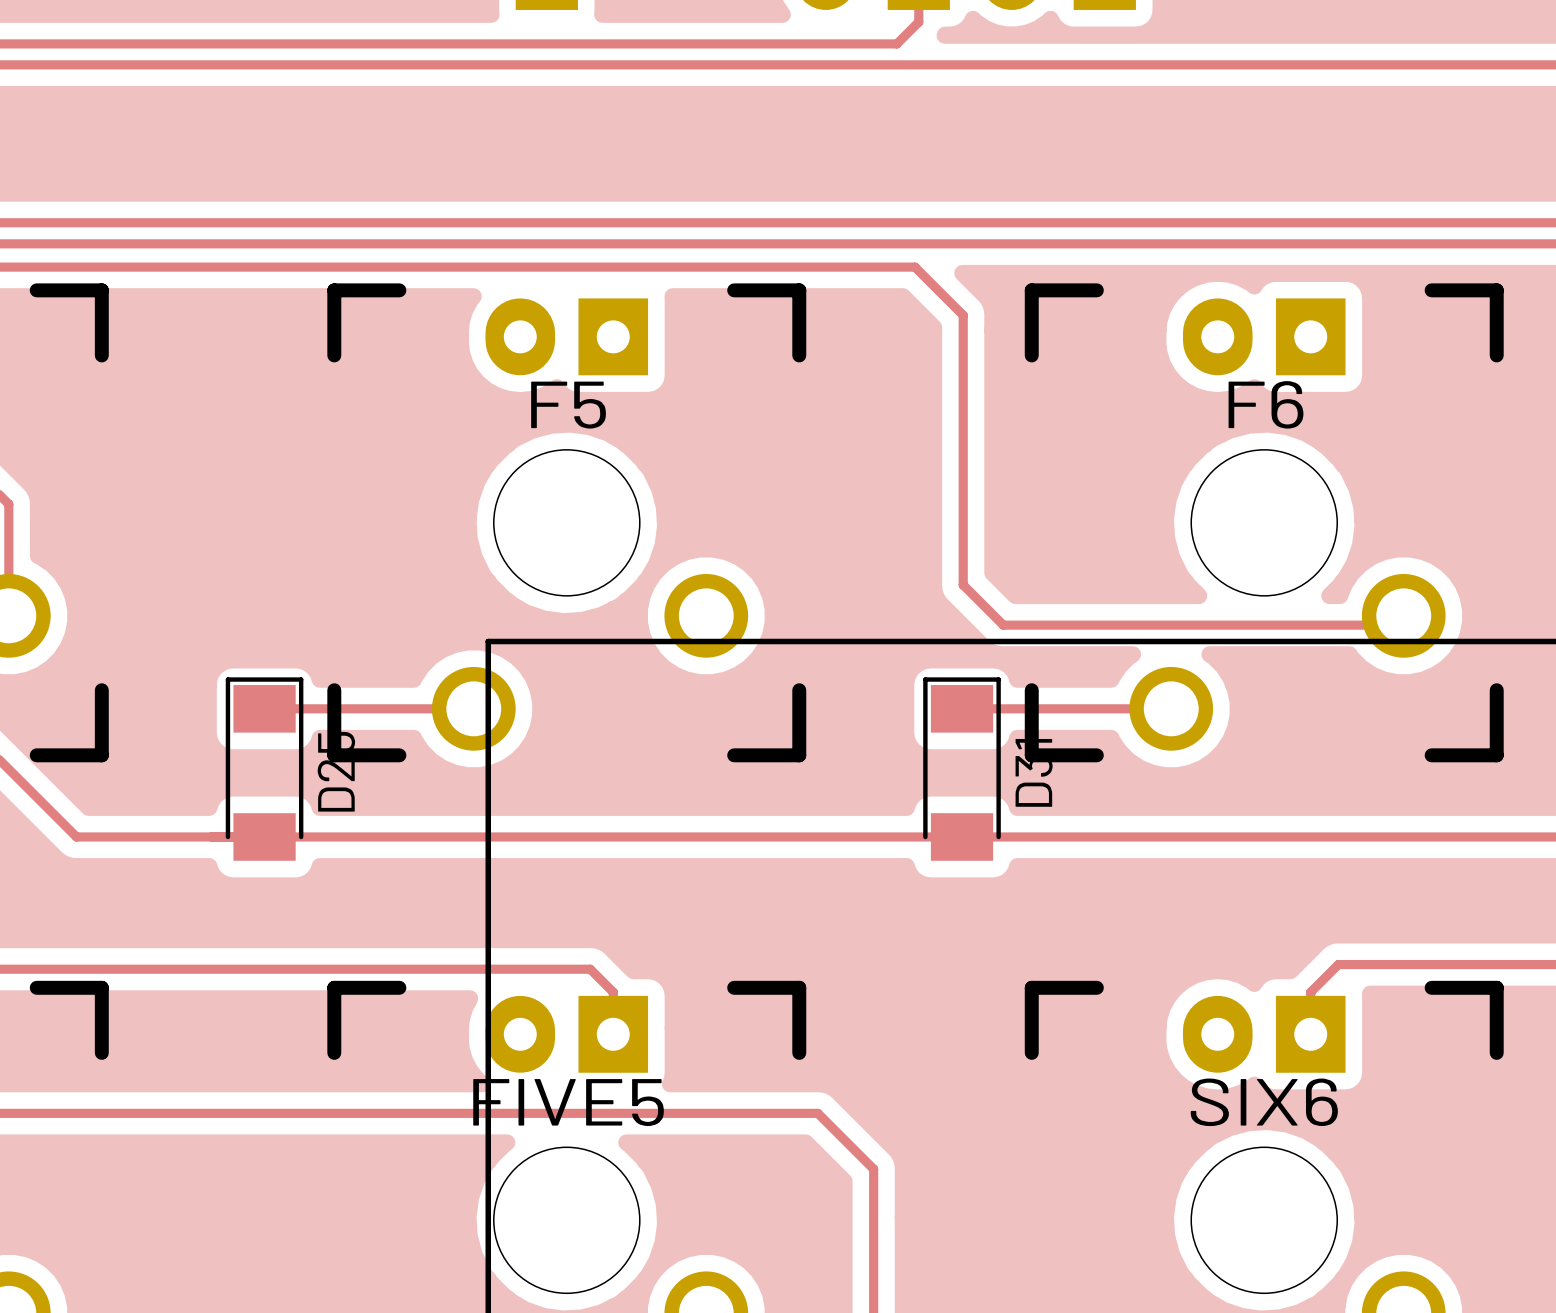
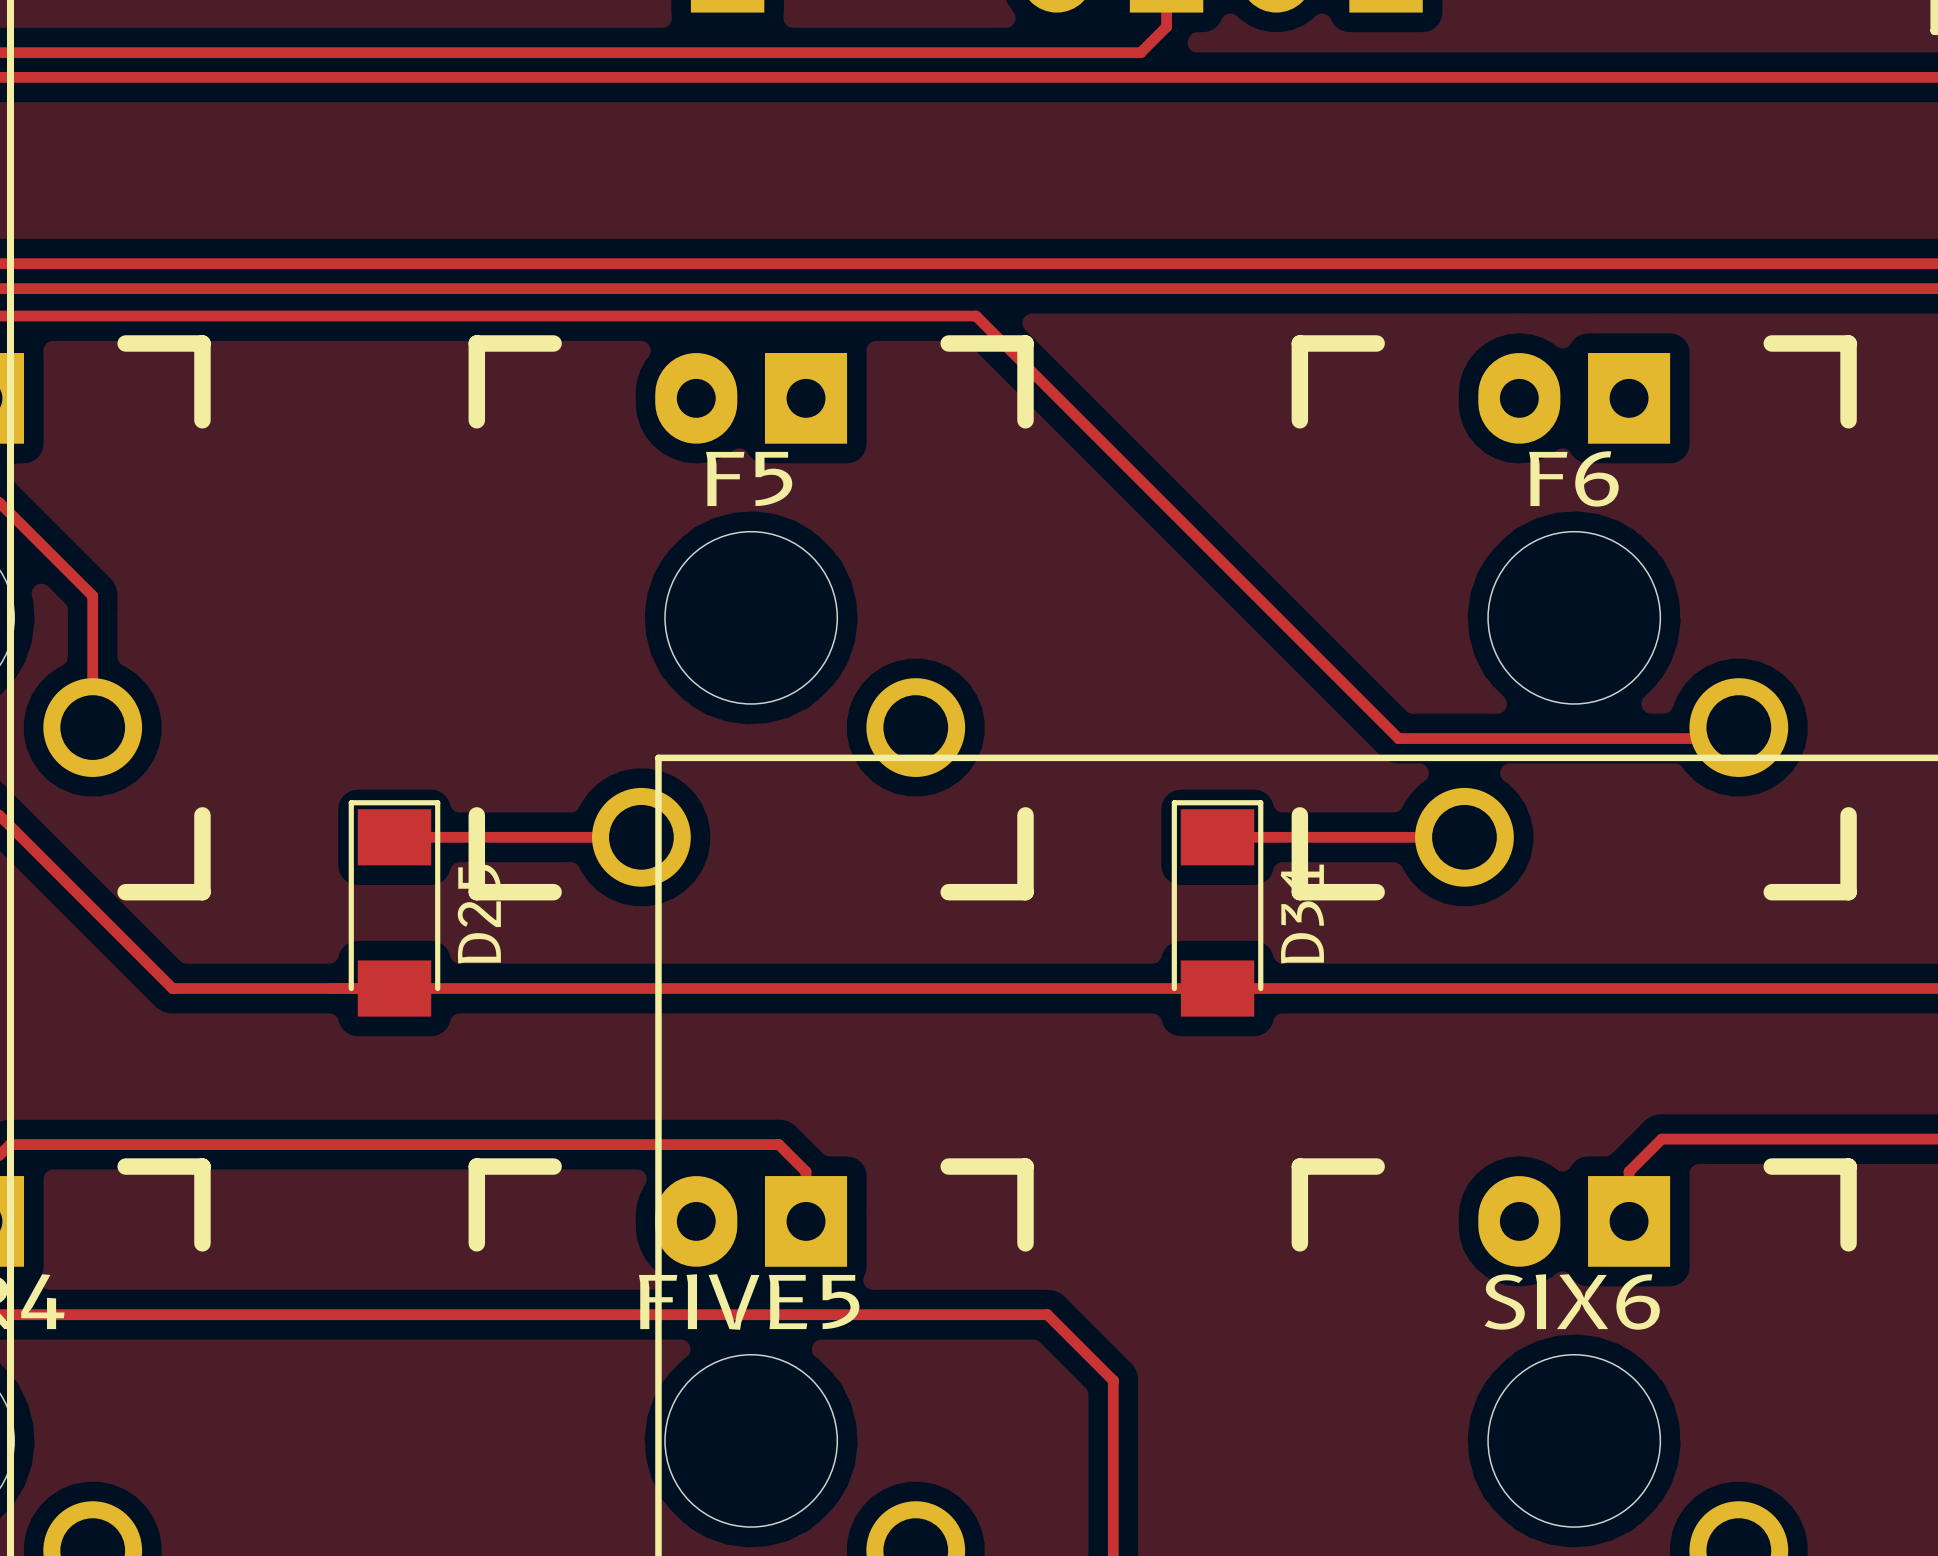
track: (757, 267) (915, 267) (963, 315) (963, 585) (1003, 625) (1115, 625) -> (976, 316) (1398, 738)

